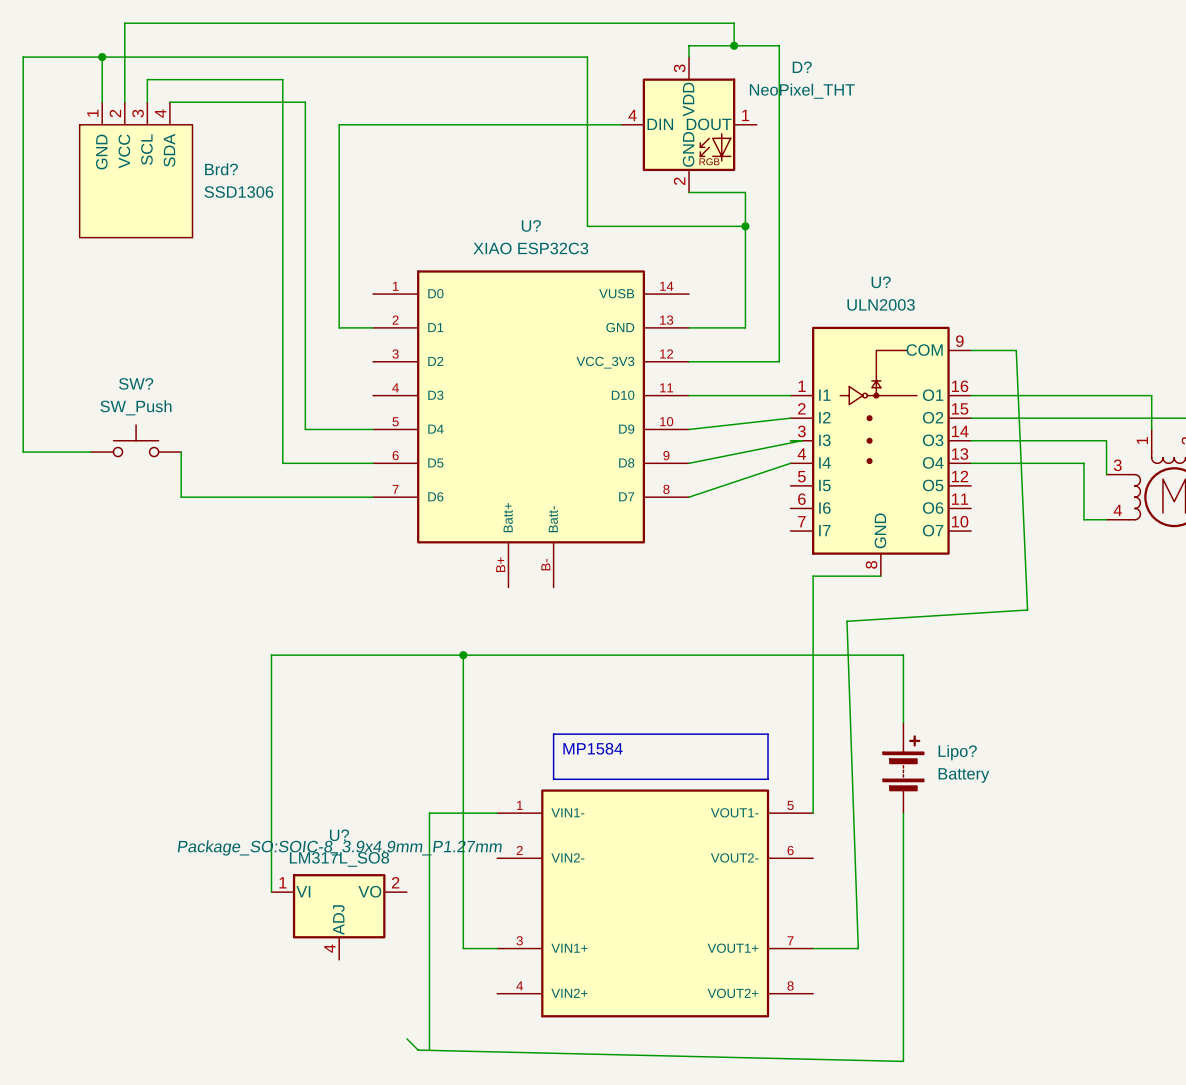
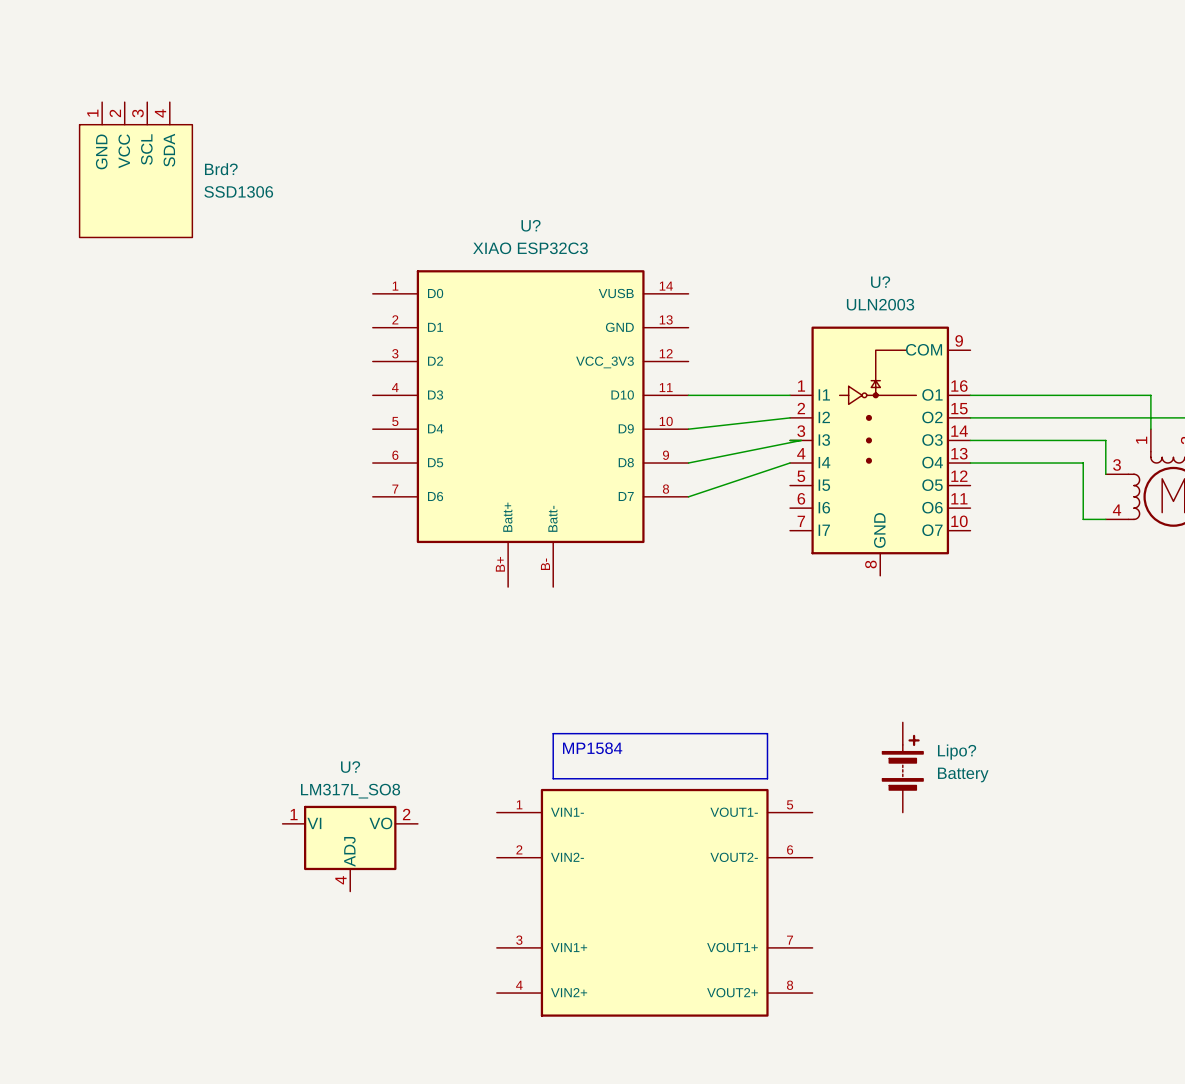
wire: (734, 45) (734, 23) (124, 23) (124, 102) -> none
junction: (734, 45) -> none
wire: (102, 57) (102, 102) -> none
junction: (102, 57) -> none
wire: (689, 57) (689, 45) (779, 45) (779, 361) (689, 361) -> none
wire: (147, 102) (147, 79) (282, 79) (282, 463) (373, 463) -> none
wire: (169, 102) (305, 102) (305, 429) (373, 429) -> none
wire: (621, 124) (339, 124) (339, 327) (373, 327) -> none
D?: NeoPixel_THT (689, 124) -> none
wire: (689, 192) (745, 192) (745, 327) (689, 327) -> none
wire: (745, 226) (587, 226) (587, 57) (23, 57) (23, 452) (90, 452) -> none
junction: (745, 226) -> none
wire: (971, 350) (1016, 350) (1027, 610) (847, 621) (858, 948) (813, 948) -> none
SW?: SW_Push (136, 440) -> none
wire: (181, 452) (181, 497) (373, 497) -> none
wire: (880, 576) (813, 576) (813, 813) -> none
wire: (463, 655) (463, 948) (497, 948) -> none
junction: (463, 655) -> none
wire: (903, 722) (903, 655) (271, 655) (271, 892) -> none
wire: (497, 813) (429, 813) (429, 1050) -> none
wire: (903, 813) (903, 1061) (418, 1050) (406, 1038) -> none
U?: none -> LM317L_SO8 (350, 848)
U?: LM317L_SO8 (339, 916) -> none

